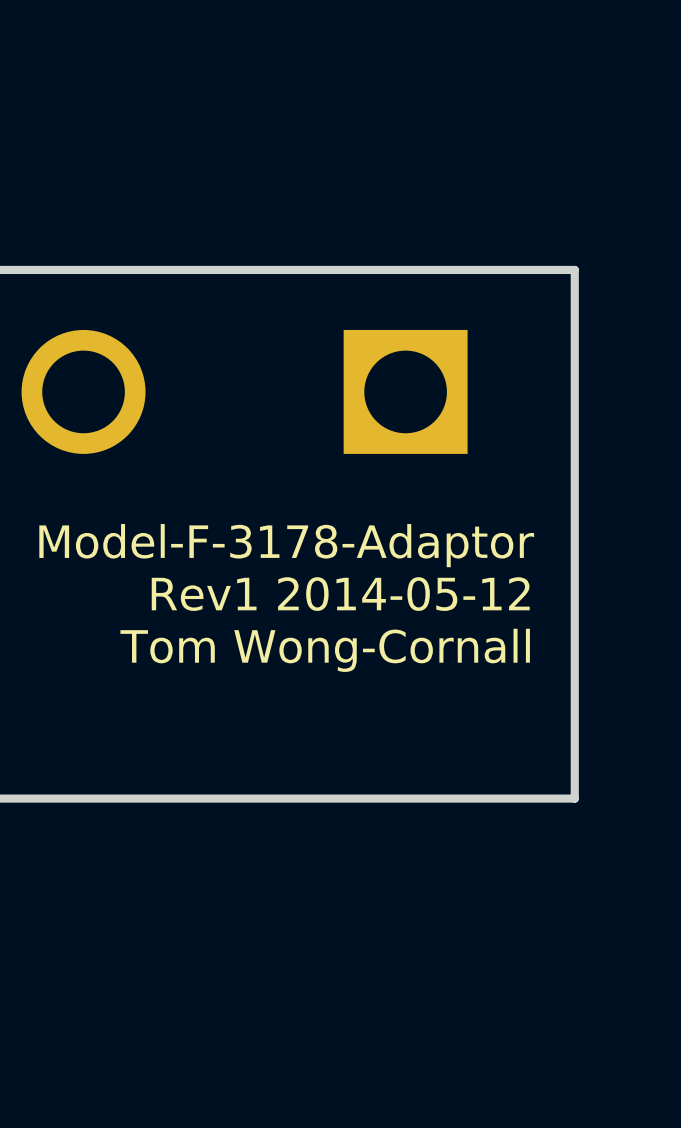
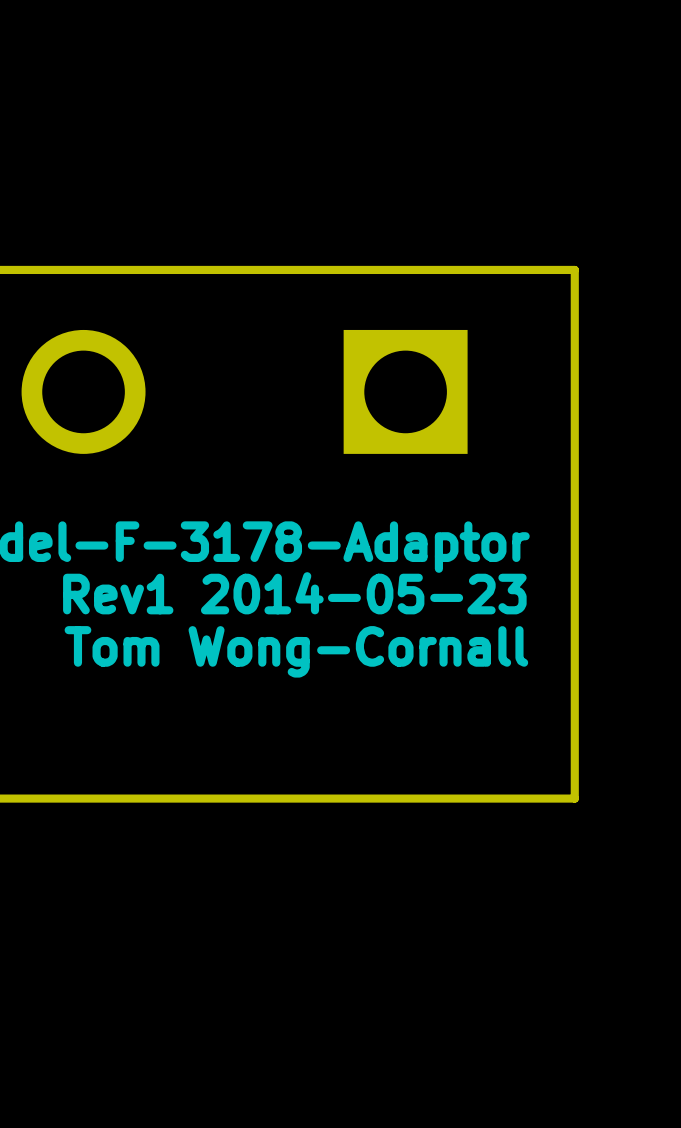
text: Rev1 2014-05-12 (340, 594) -> Rev1 2014-05-23 (294, 593)

